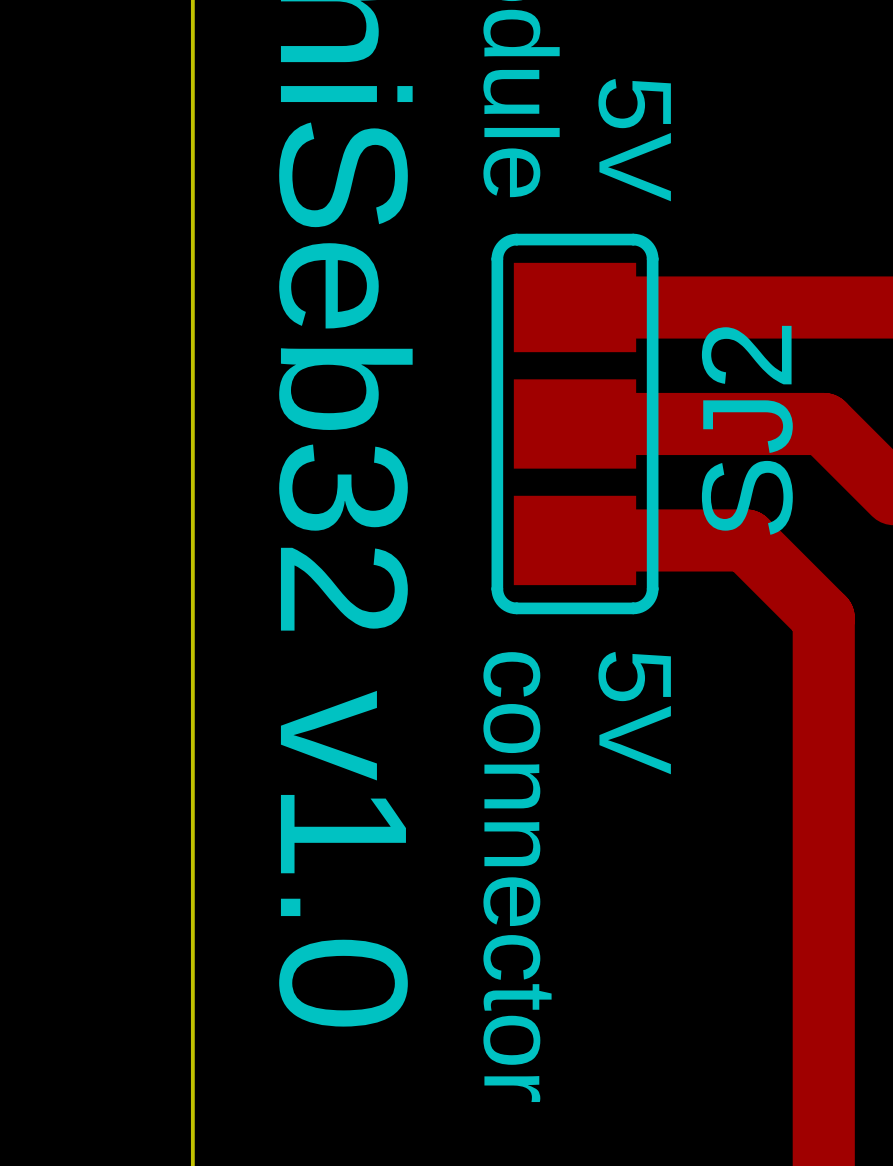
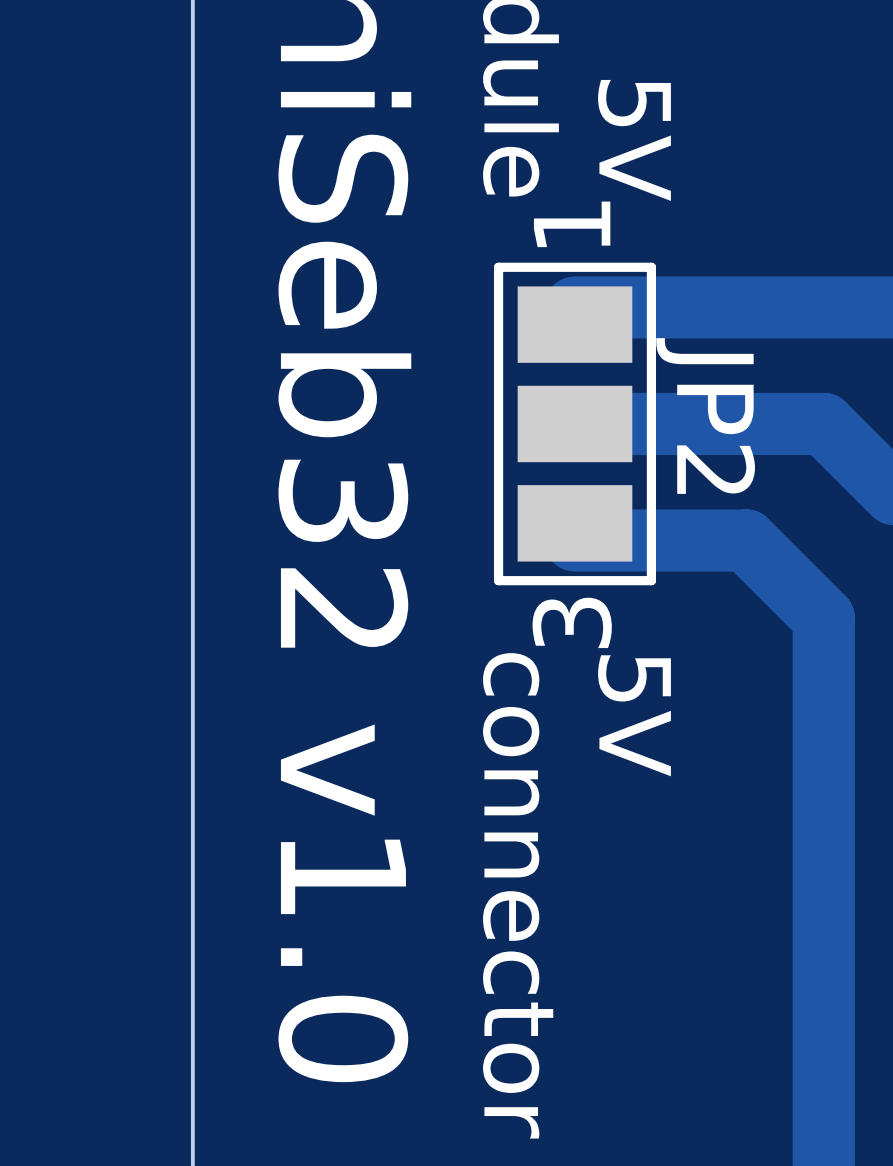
SJ2: (574, 423) -> none
JP2: none -> (574, 423)

